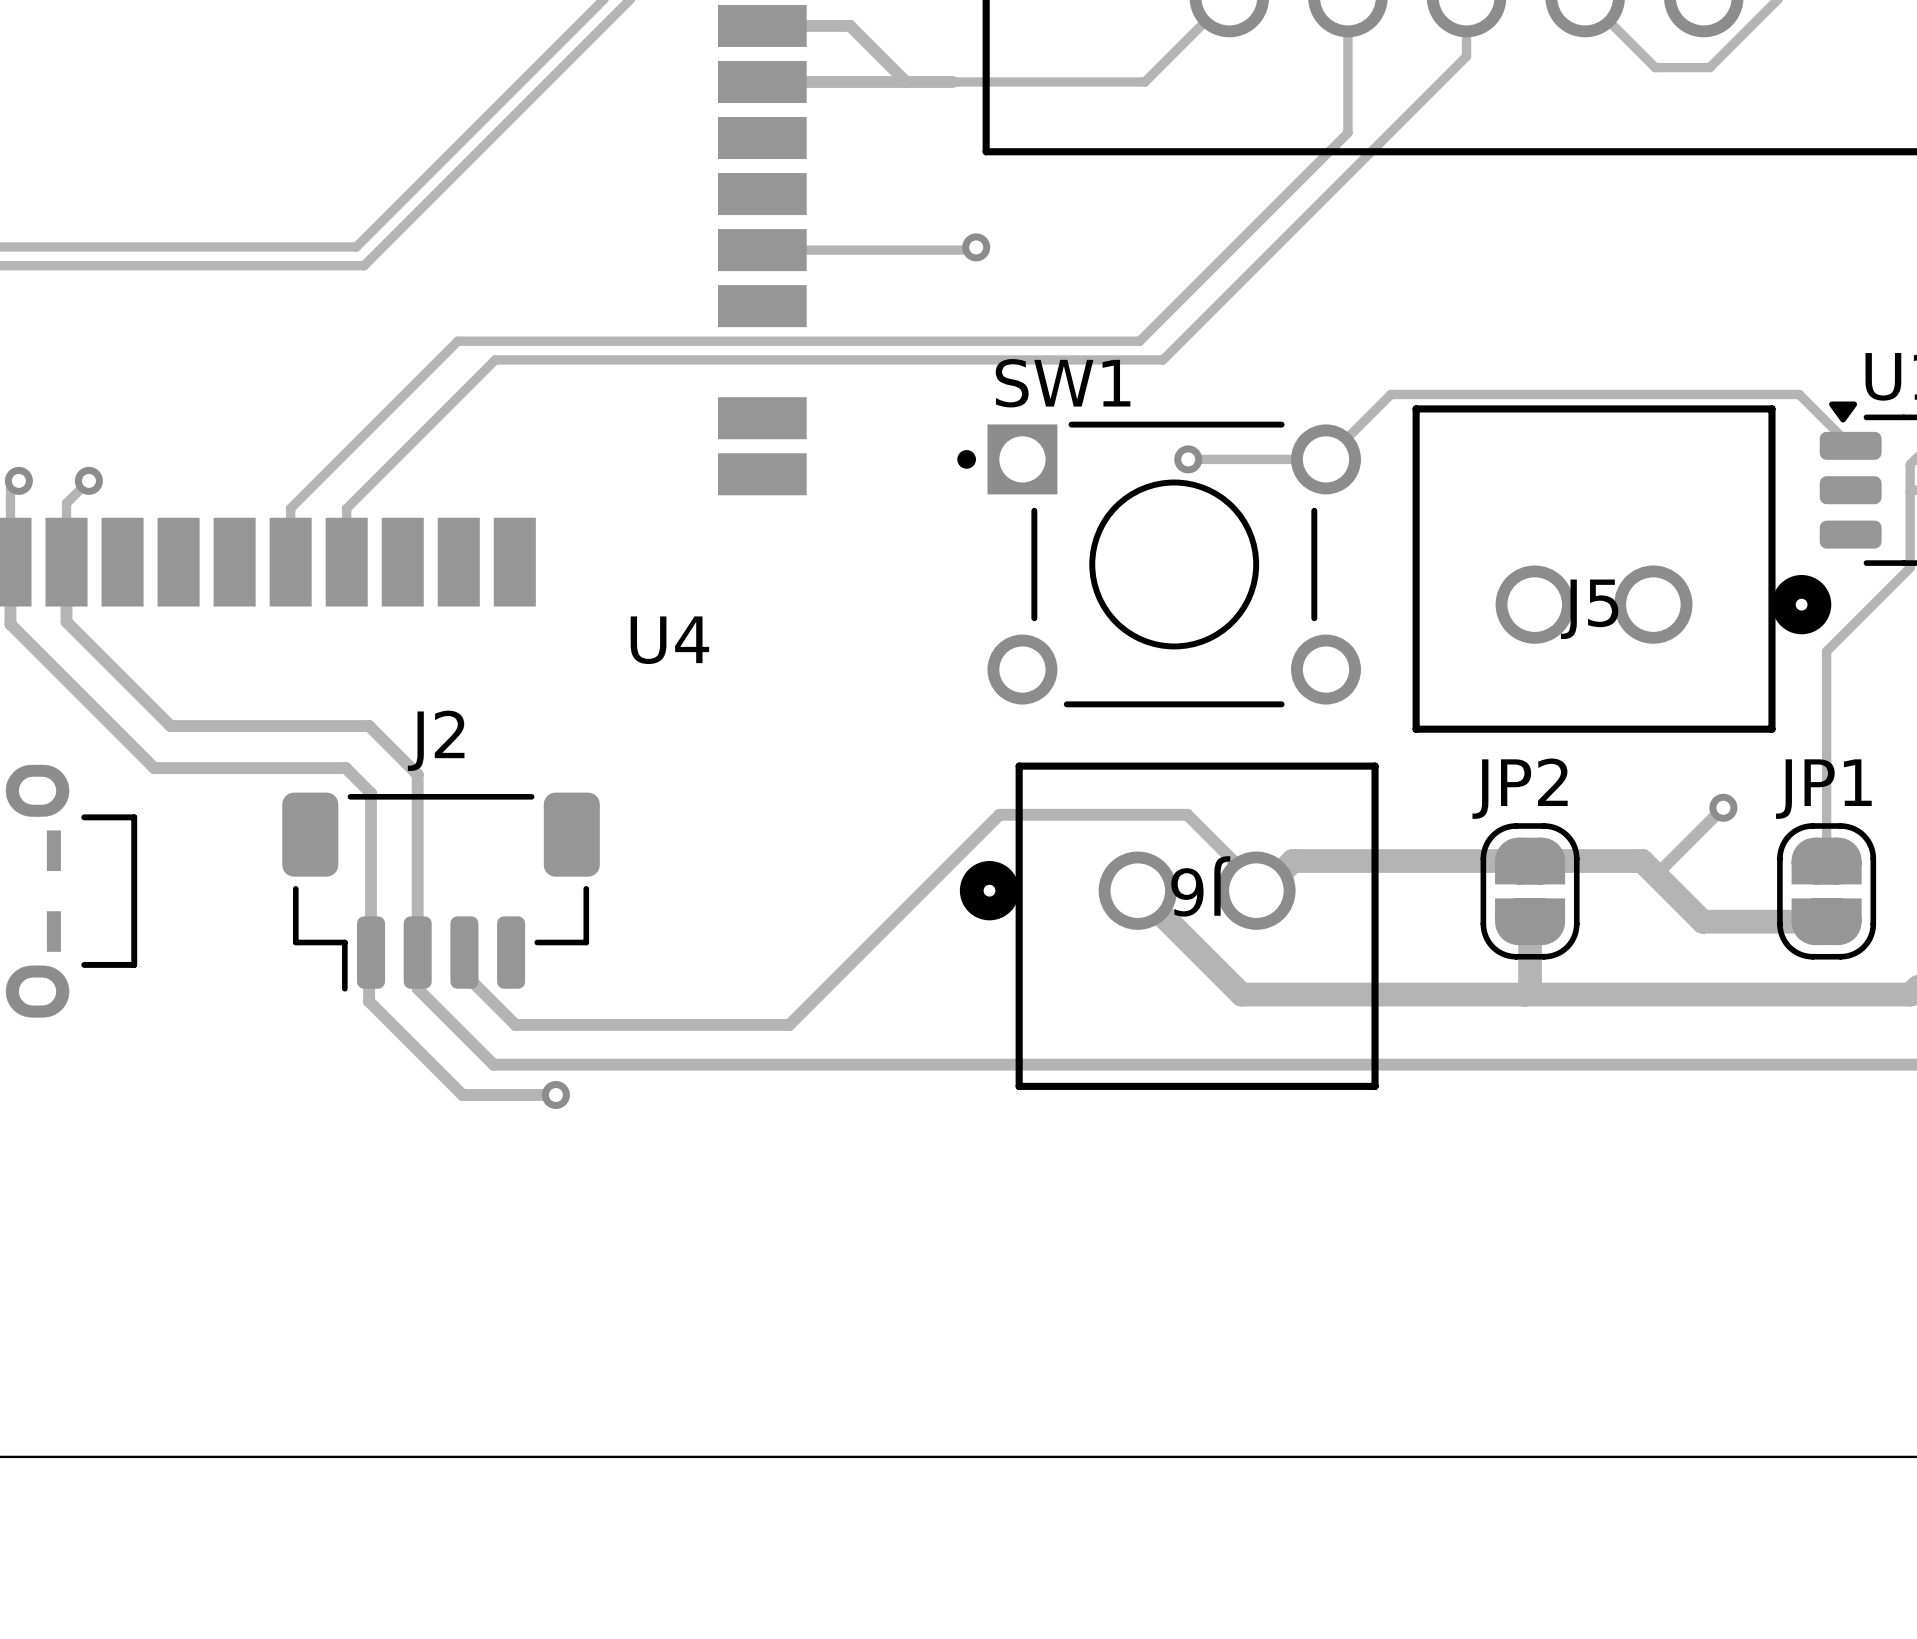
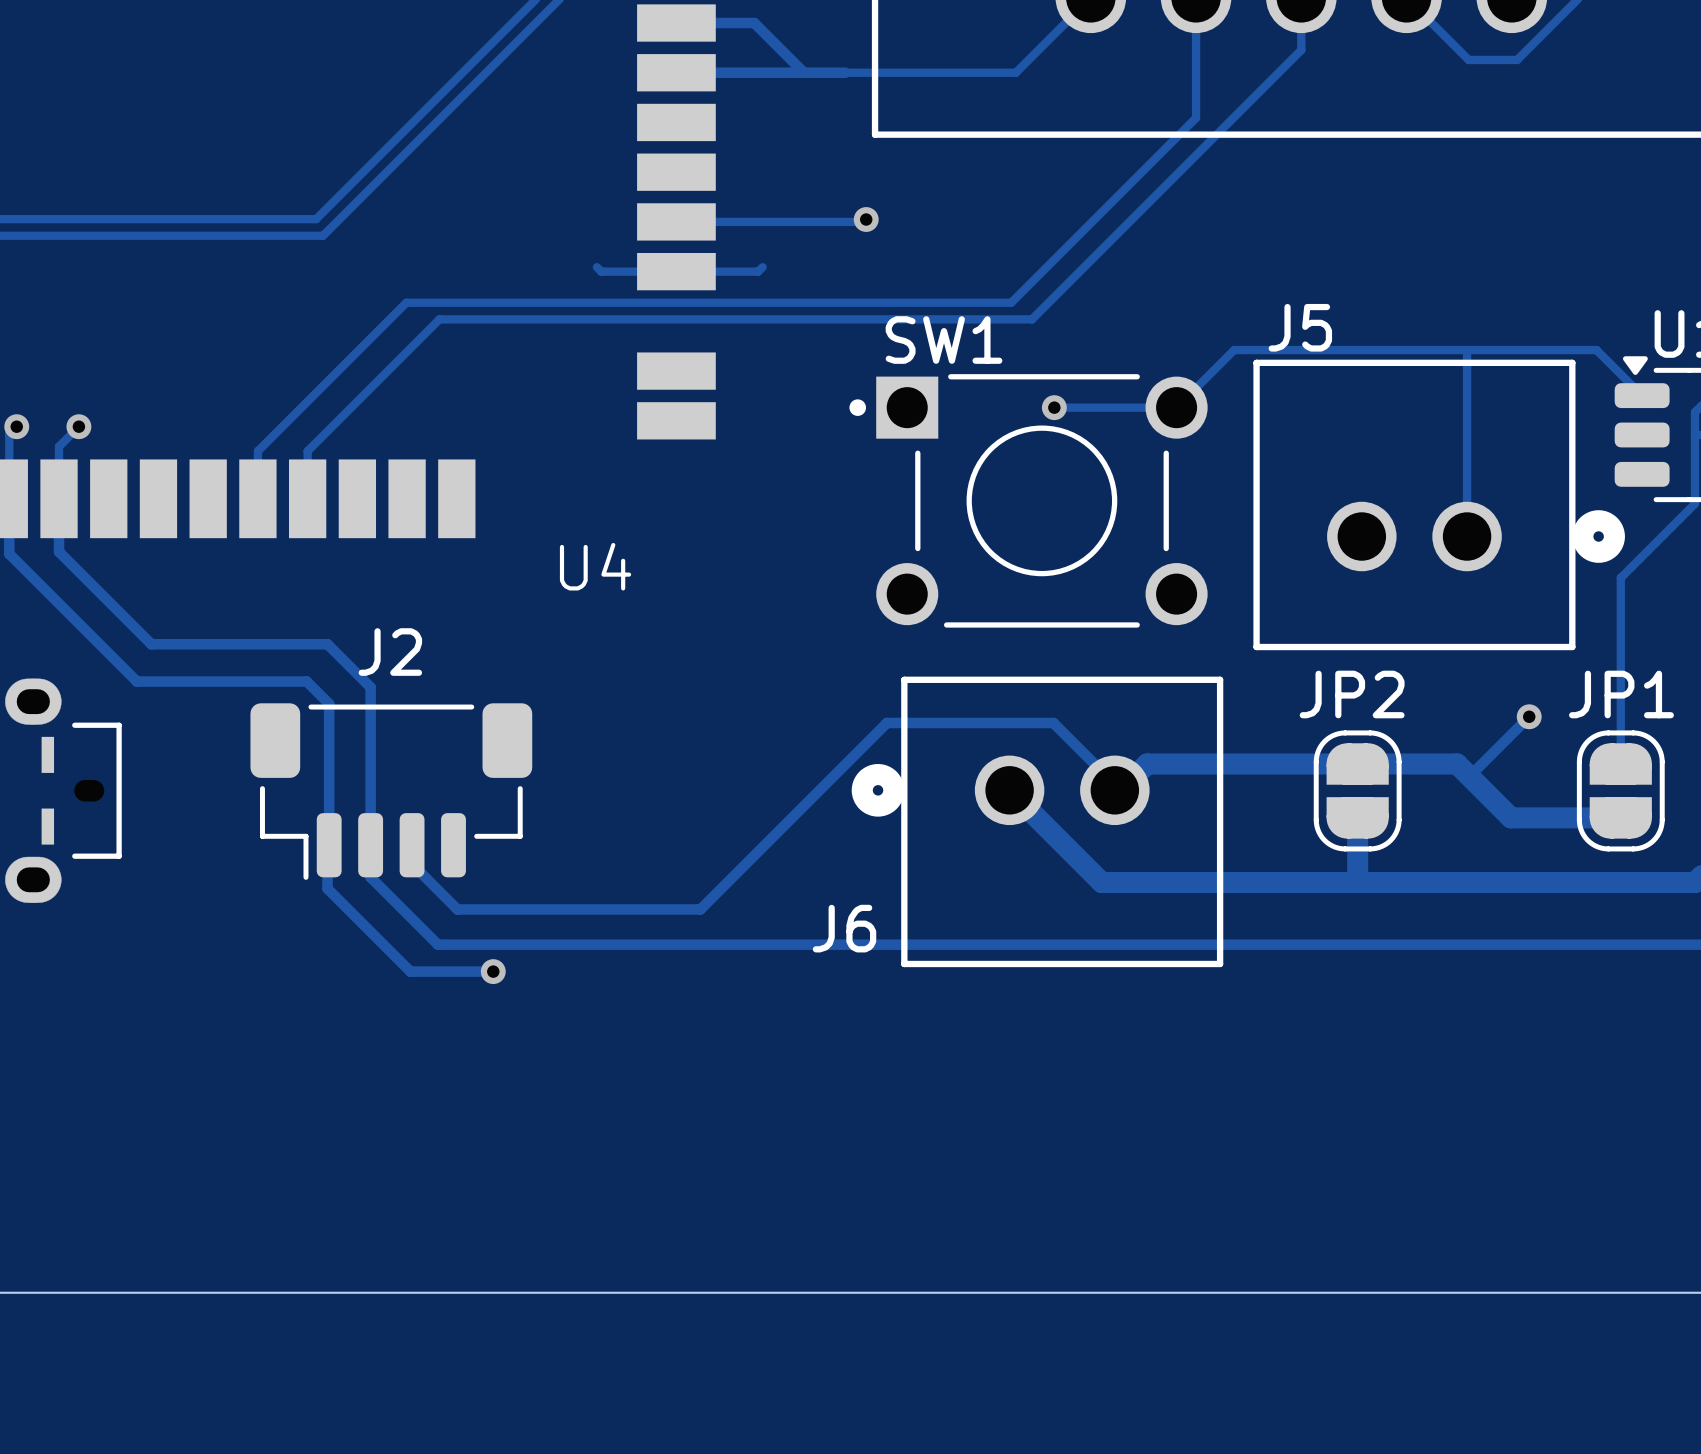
track: none -> (596, 267) (601, 271) (758, 271) (762, 267)
track: none -> (1467, 350) (1467, 536)
J5 name position: J5 (1589, 609) -> J5 (1300, 327)
J6 name rotation: 0° (1200, 886) -> 180° (844, 928)
J6 name position: J6 (1200, 886) -> J6 (844, 928)

